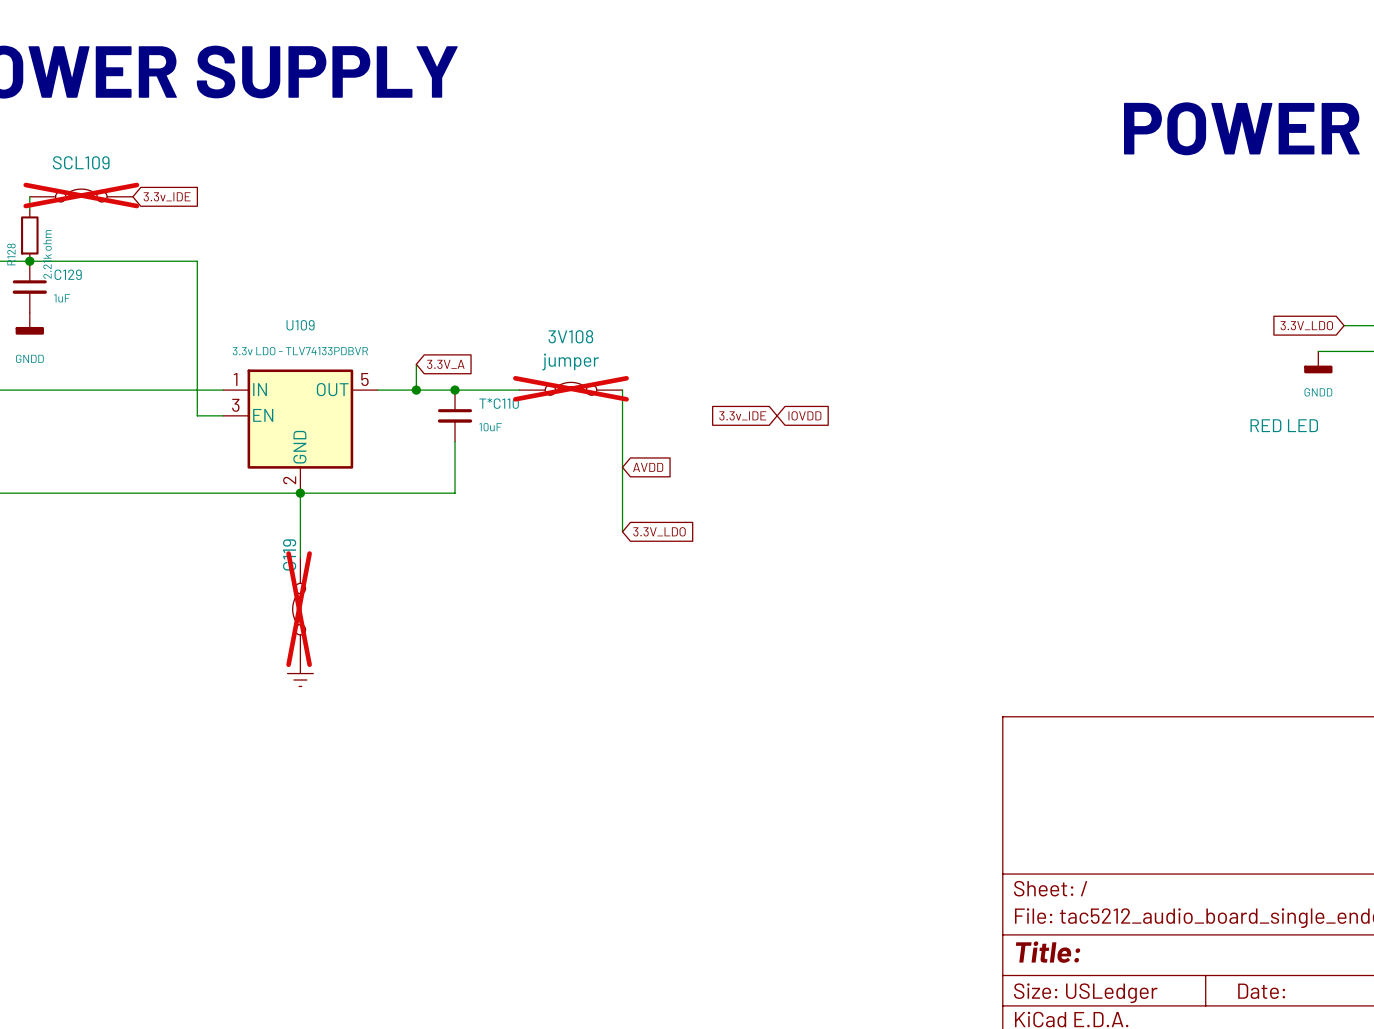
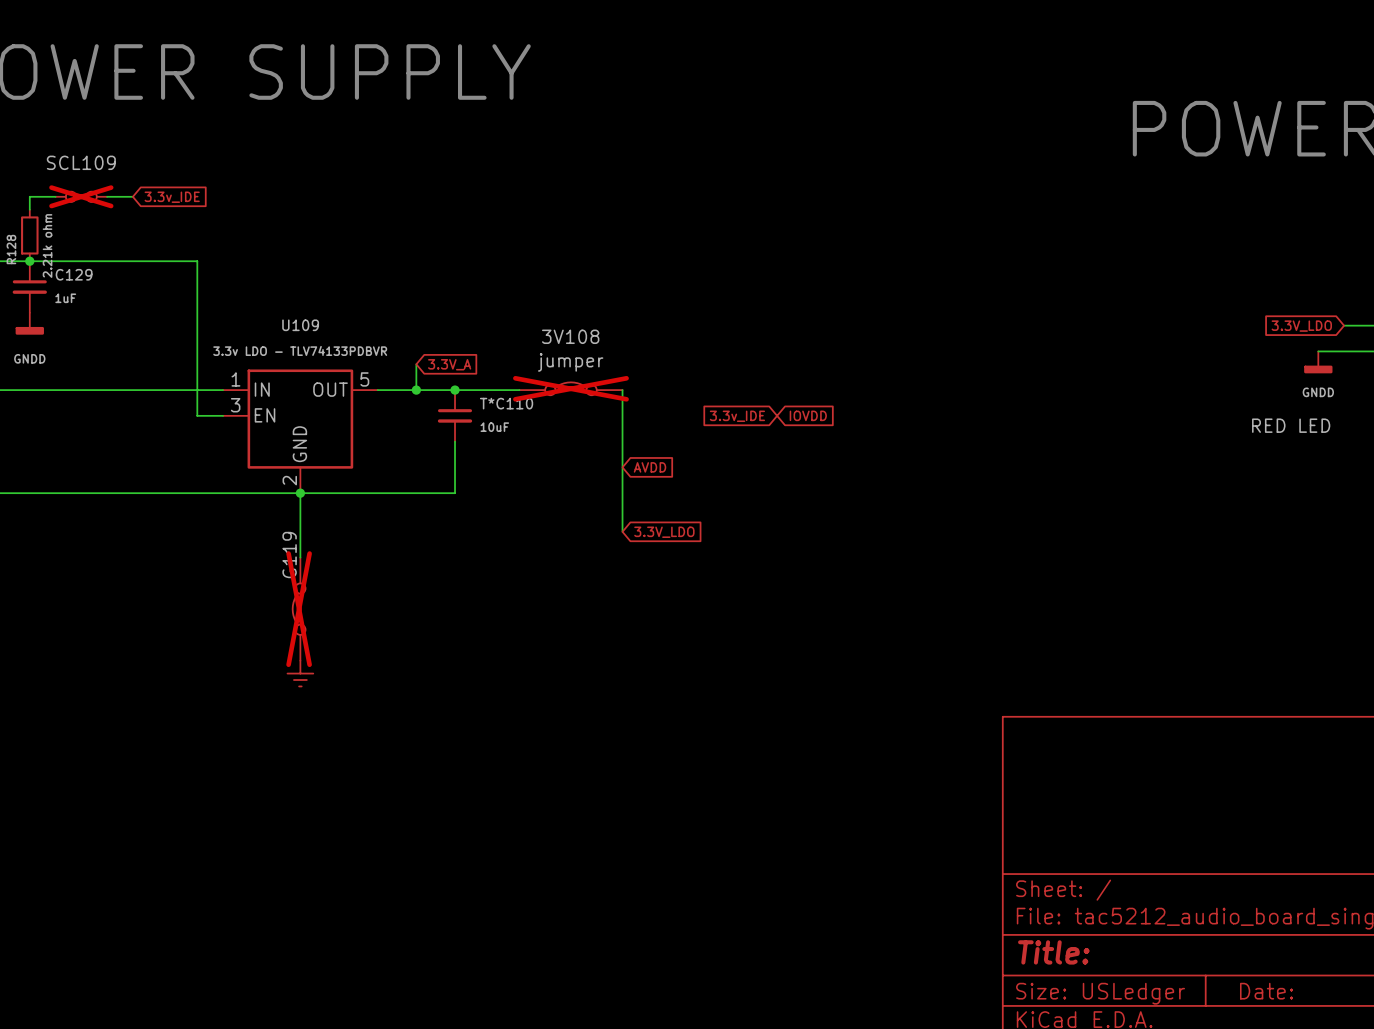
SCL109 symbol: [29, 189, 133, 202] -> [55, 191, 108, 202]

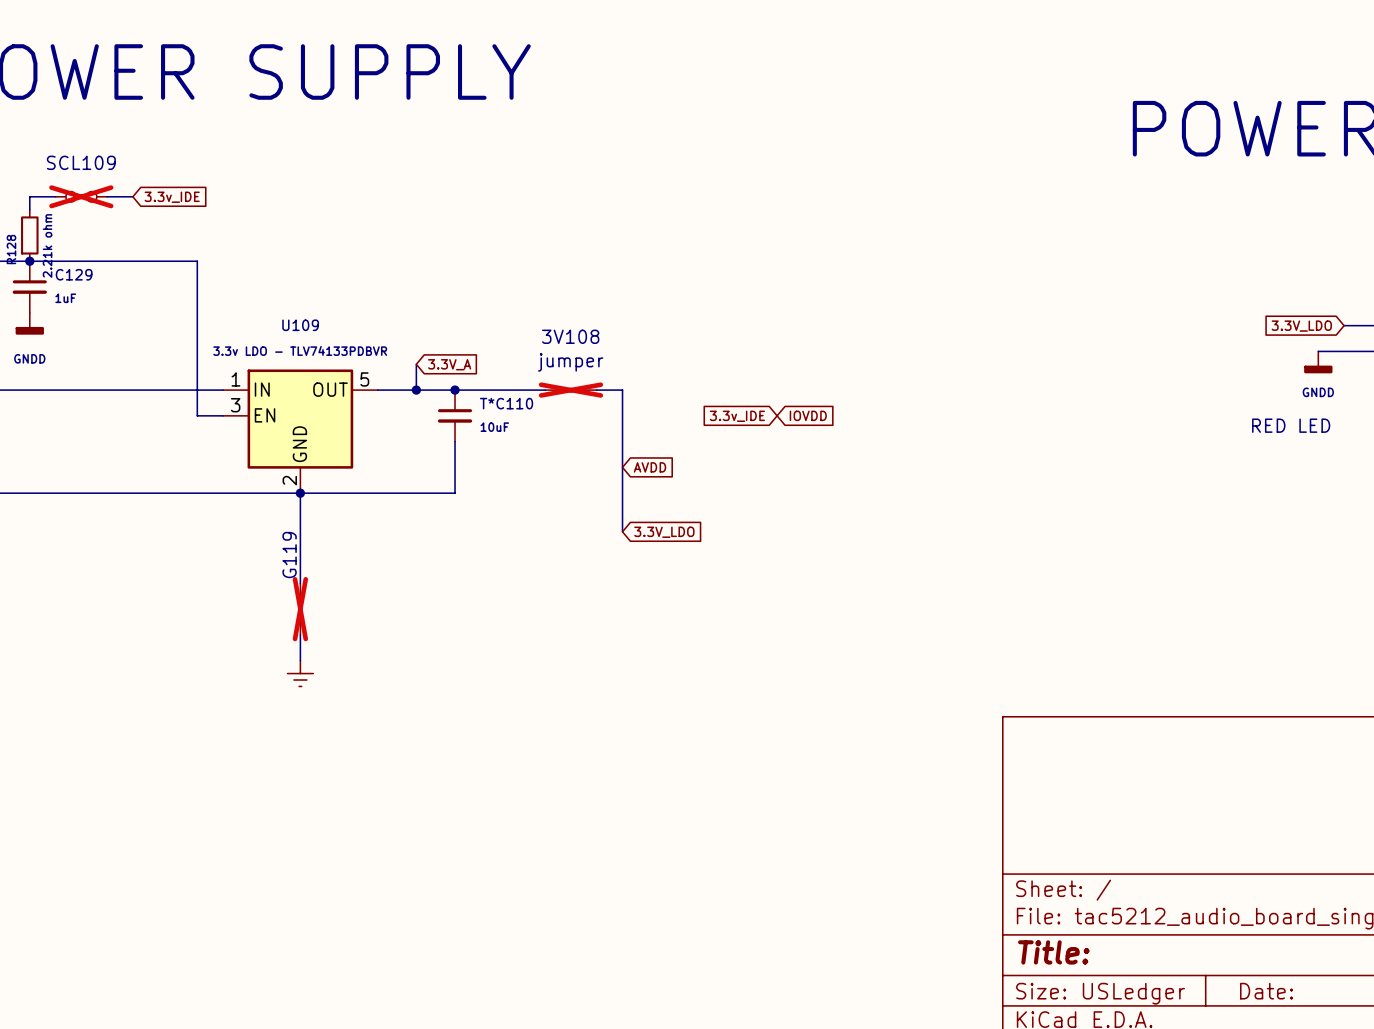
3V108 symbol: [519, 382, 623, 396] -> [545, 388, 597, 392]
G119 symbol: [292, 557, 306, 661] -> [299, 583, 302, 635]

